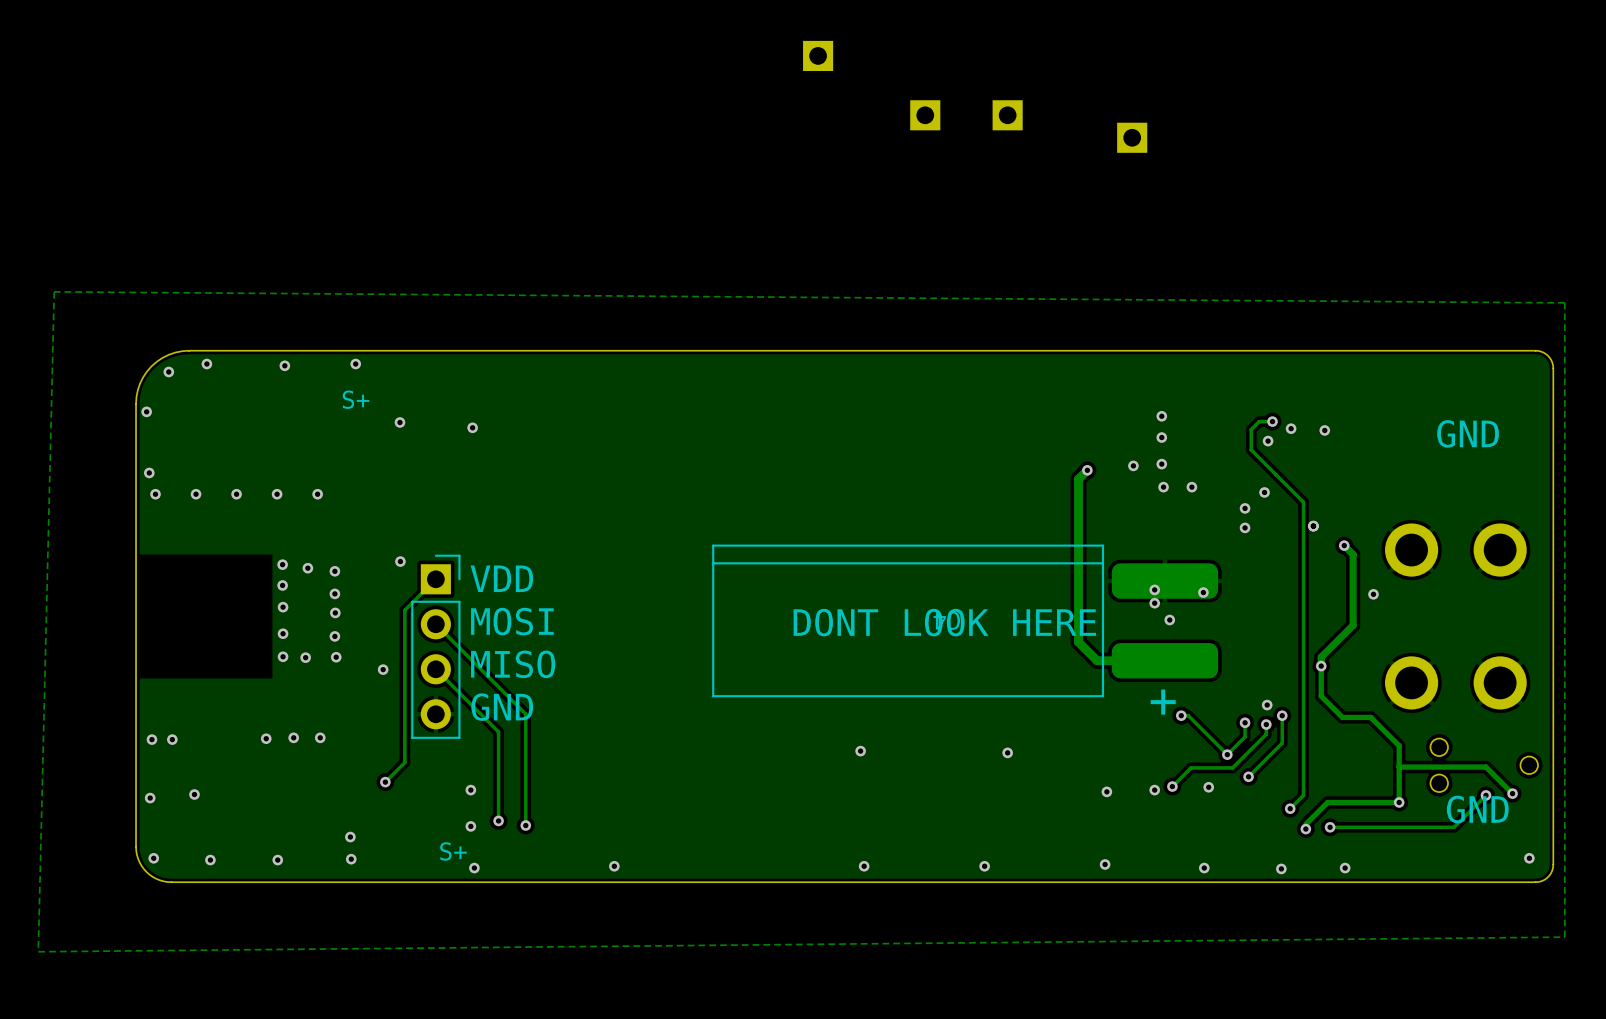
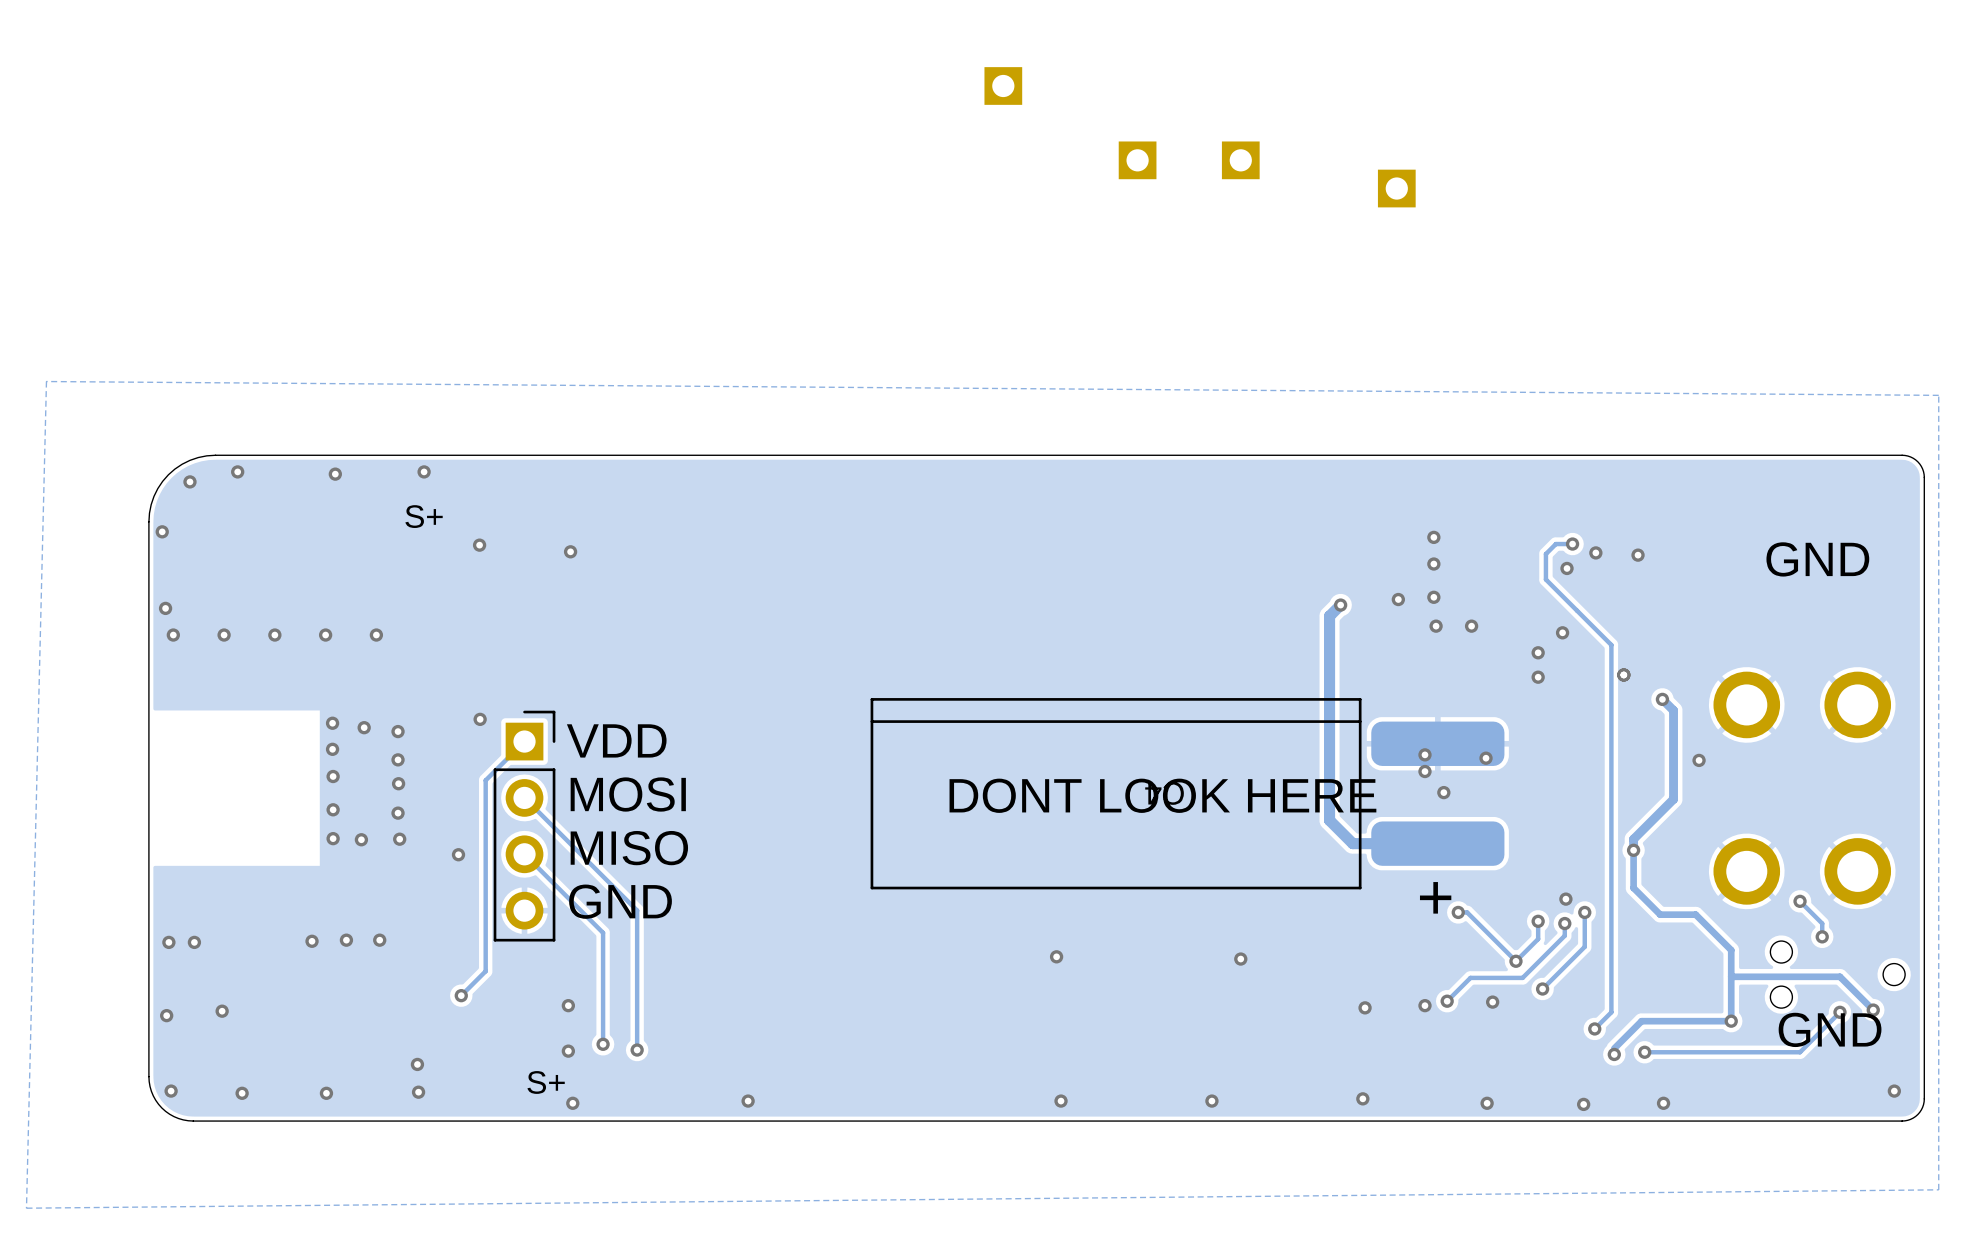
track: none -> (1800, 901) (1822, 923) (1822, 936)
via: none -> (1800, 901)
via: none -> (1822, 936)

